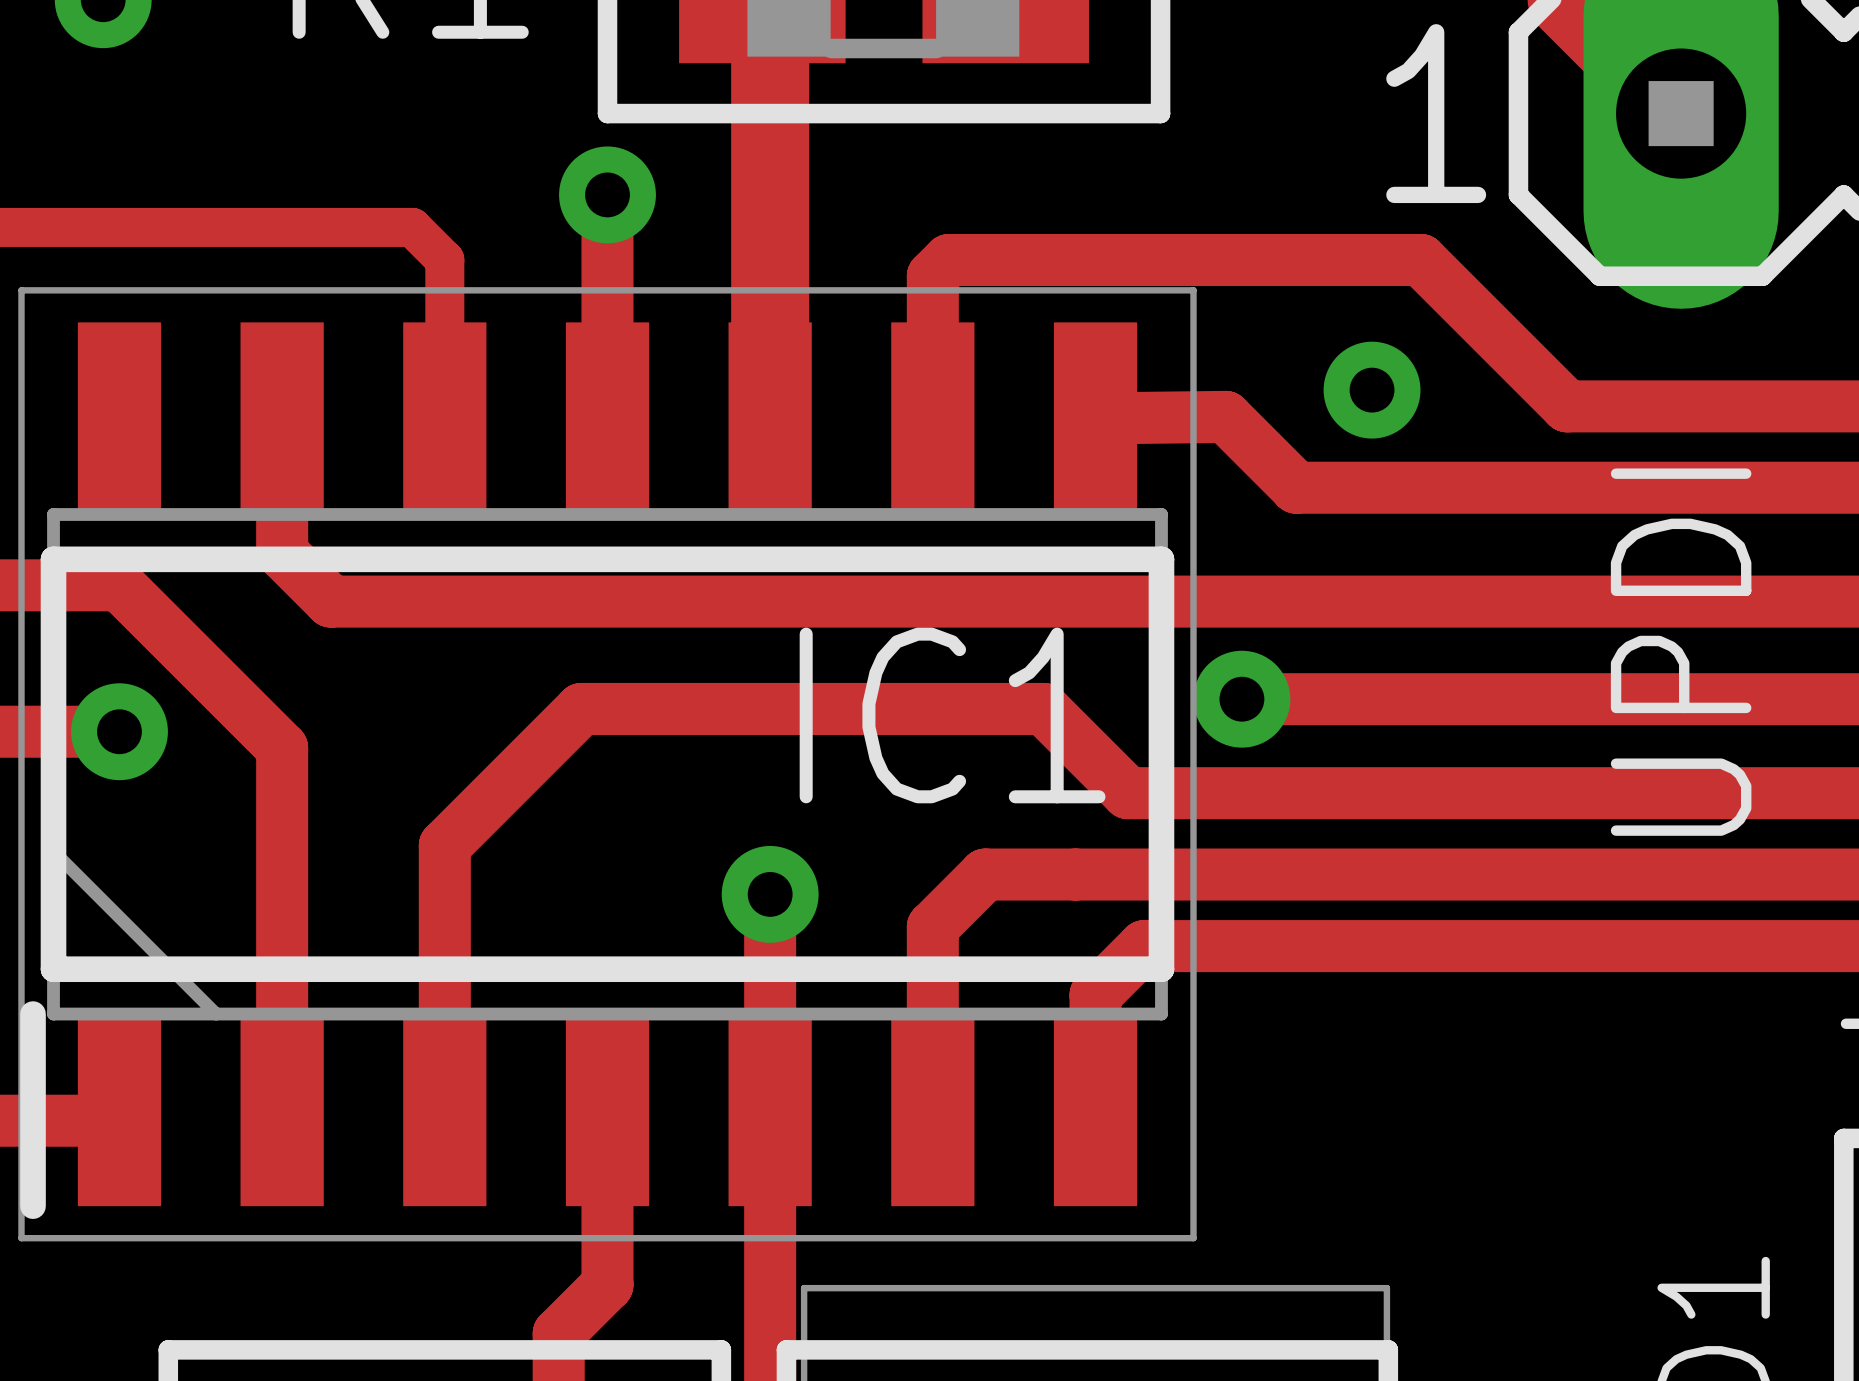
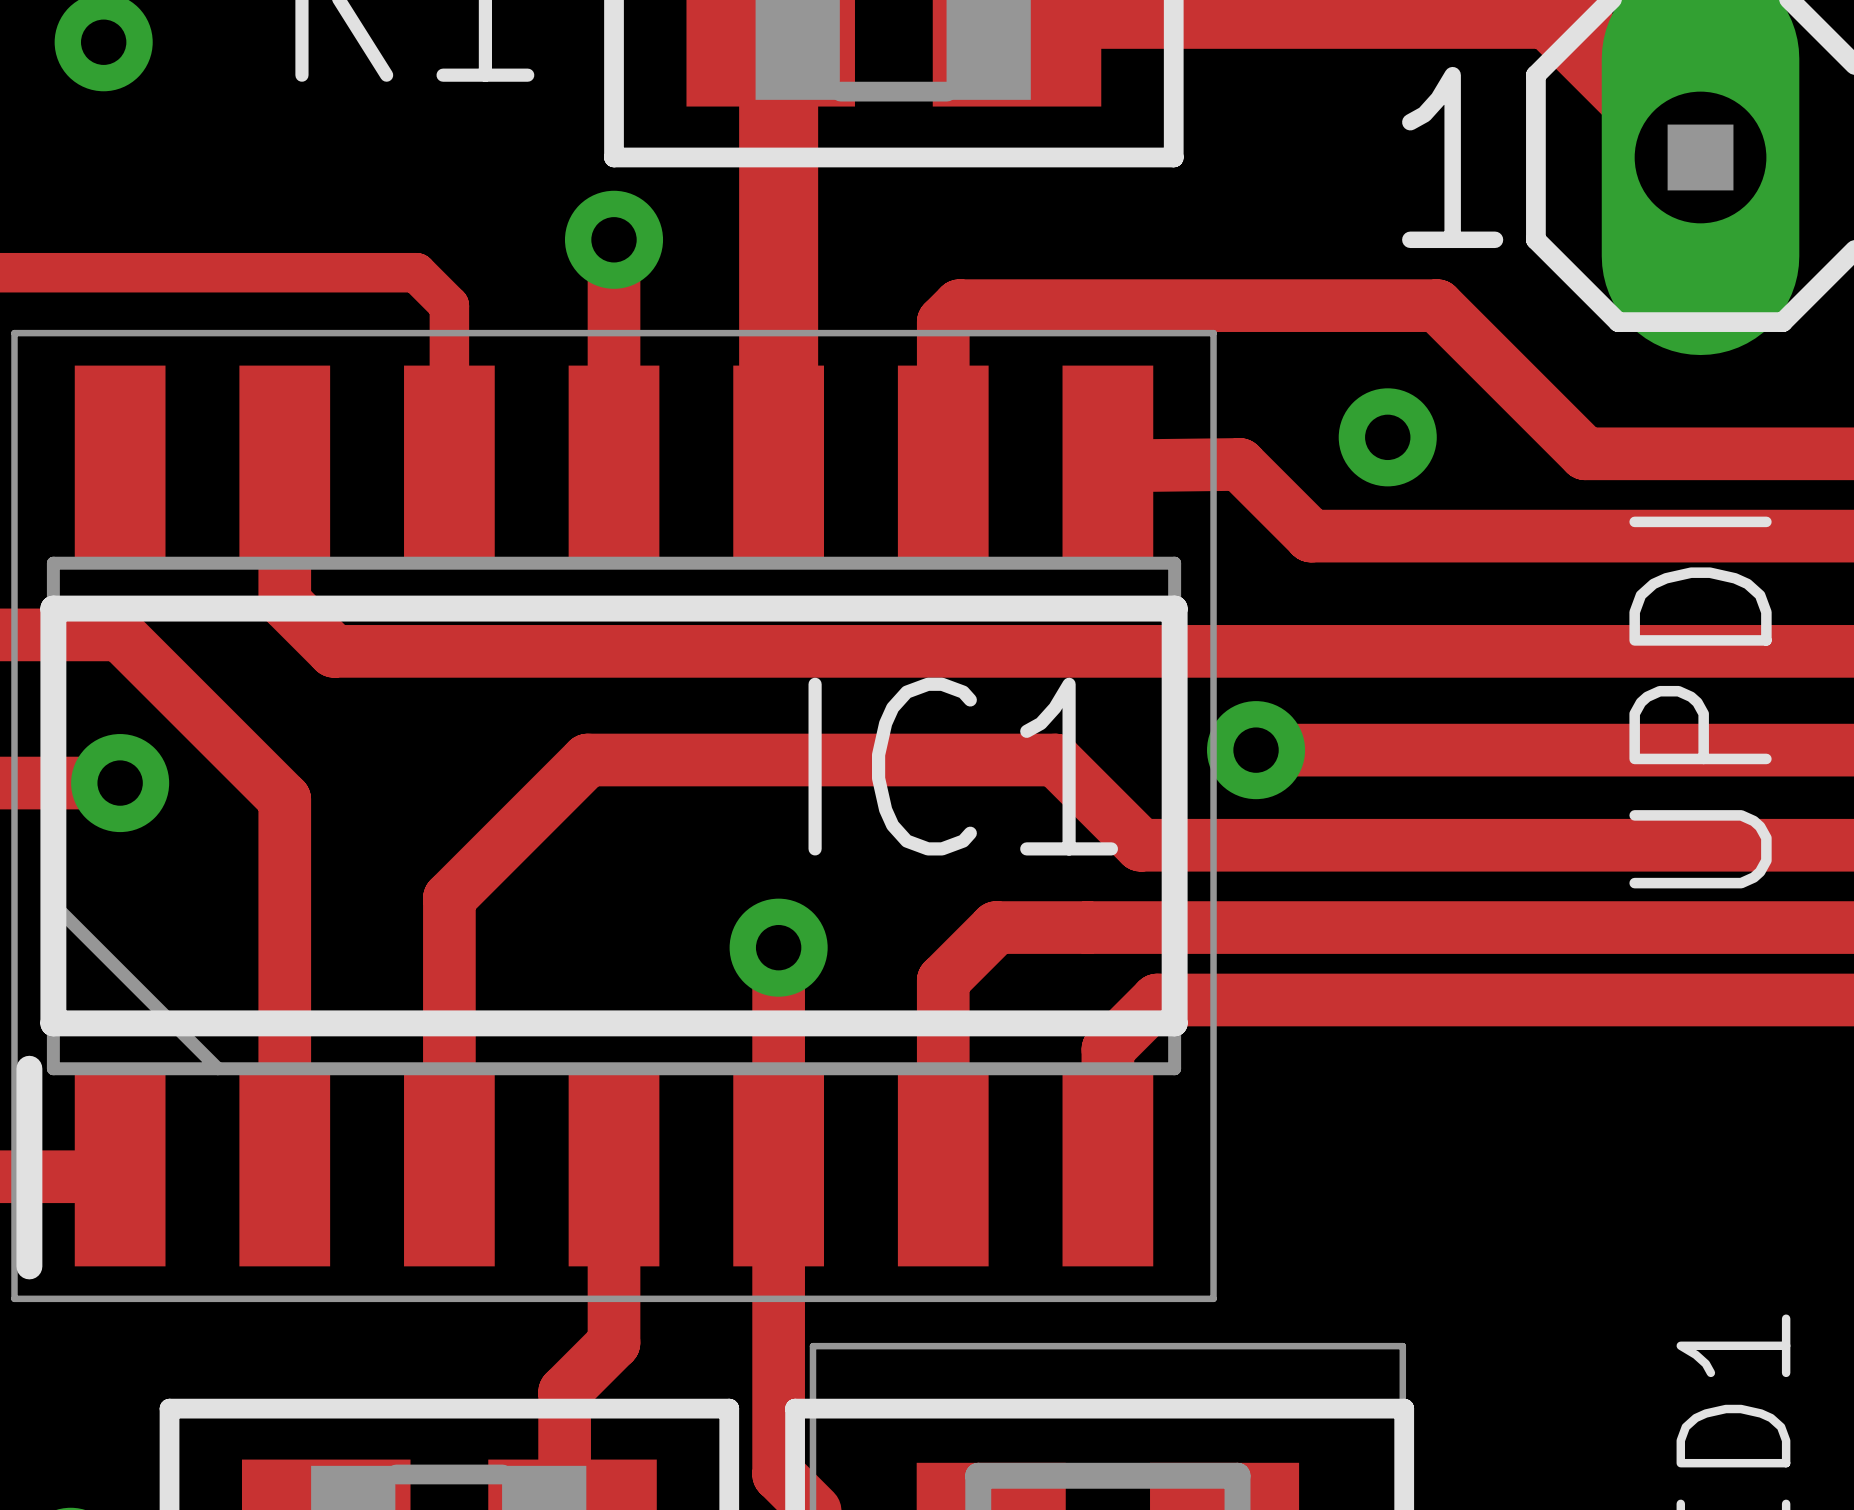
IC1 footprint: [18, 287, 1197, 1242] -> [11, 329, 1217, 1303]

